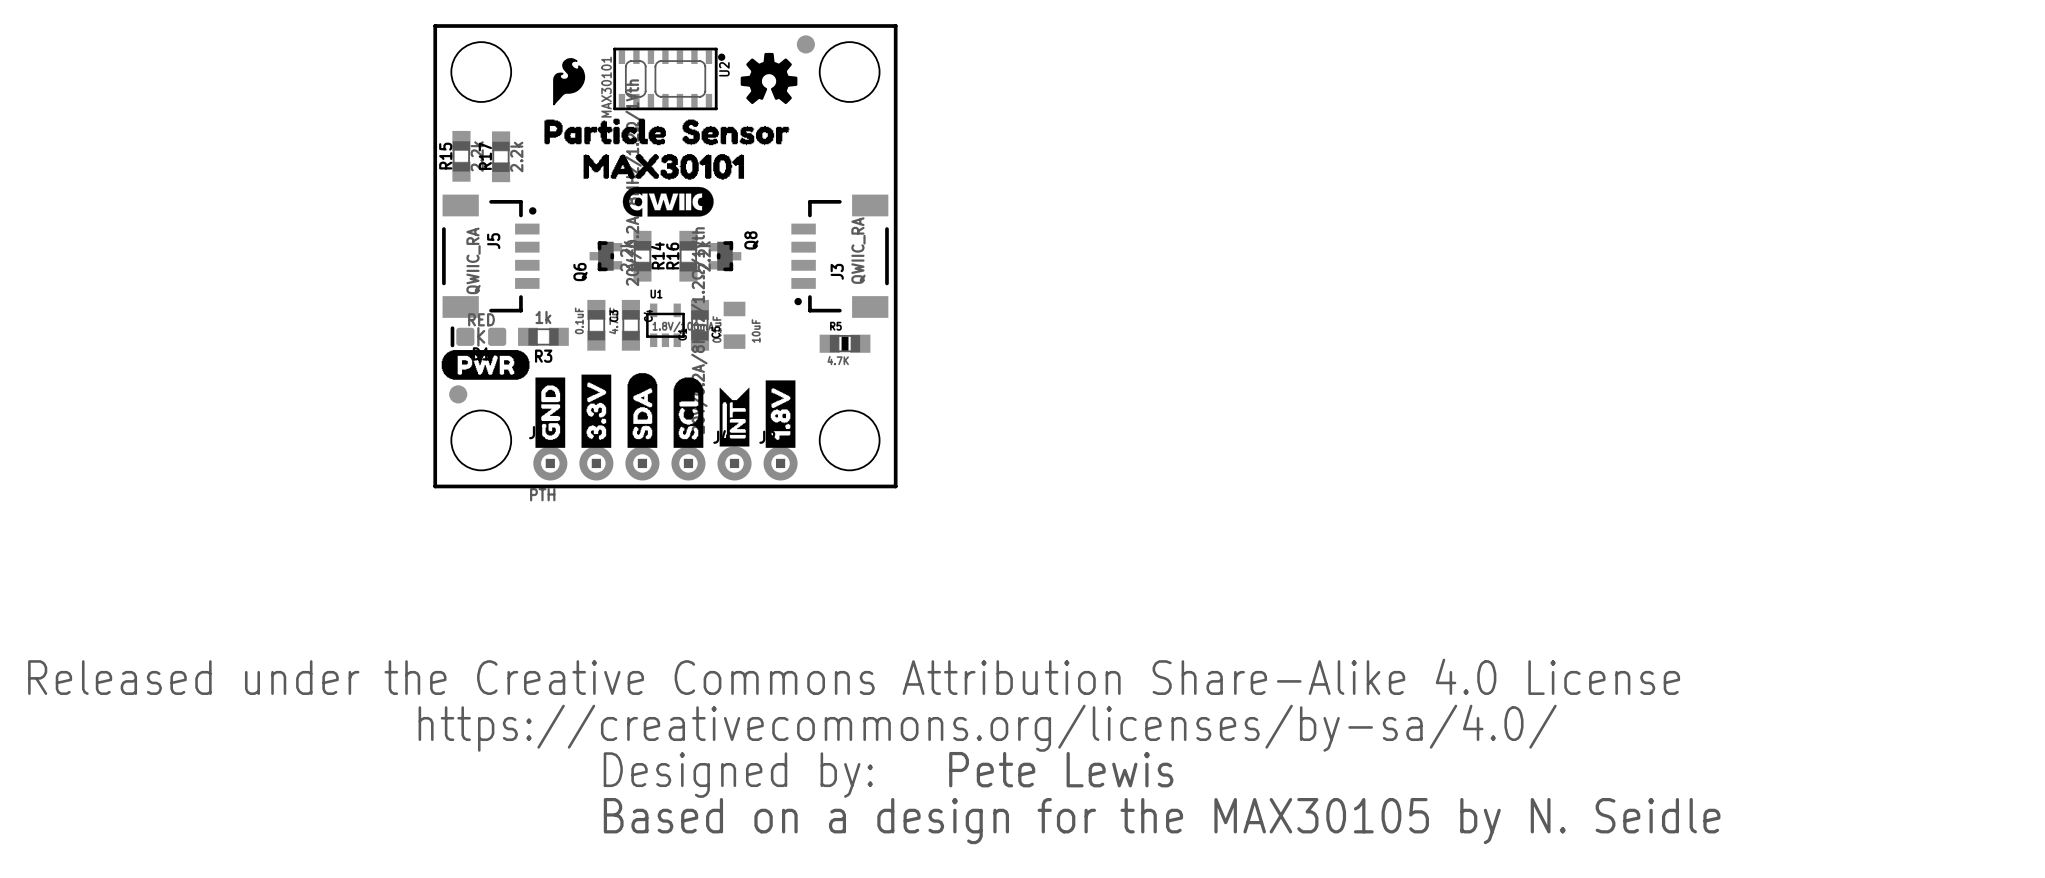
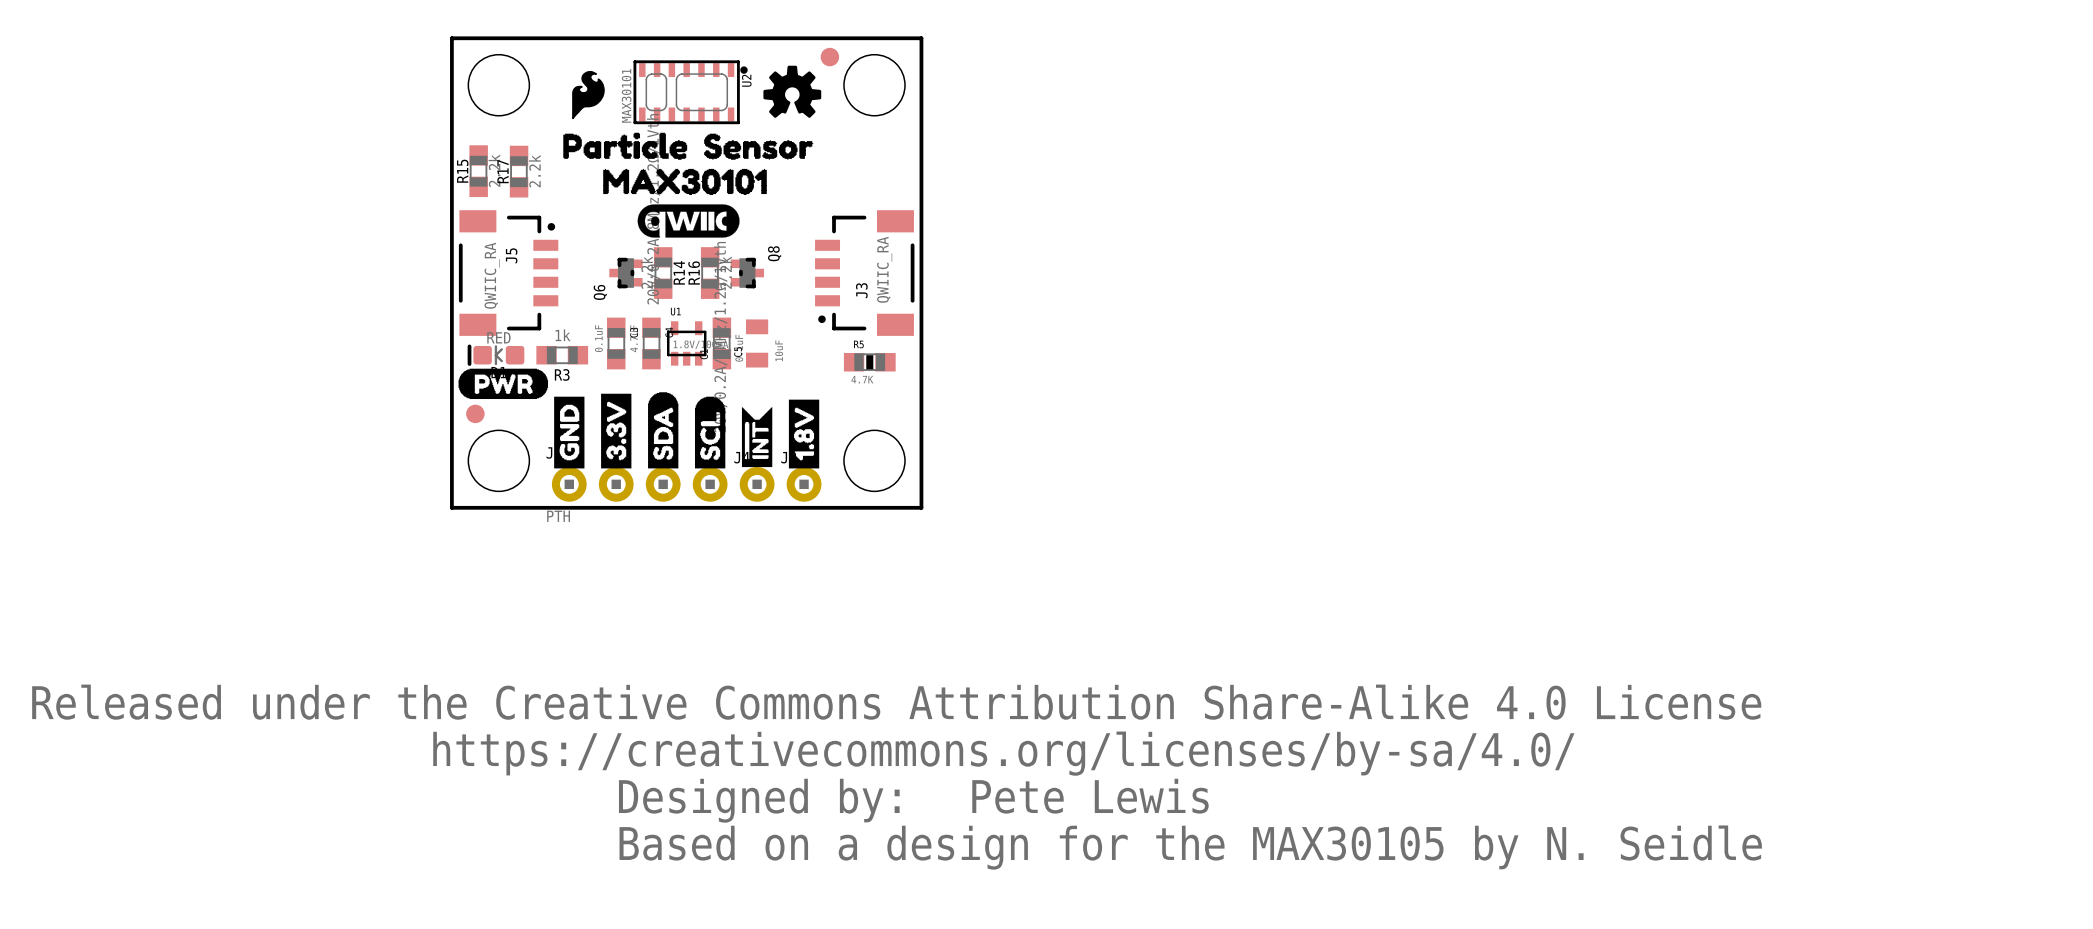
drawing shape: [622, 186, 714, 217] -> [637, 204, 740, 238]

